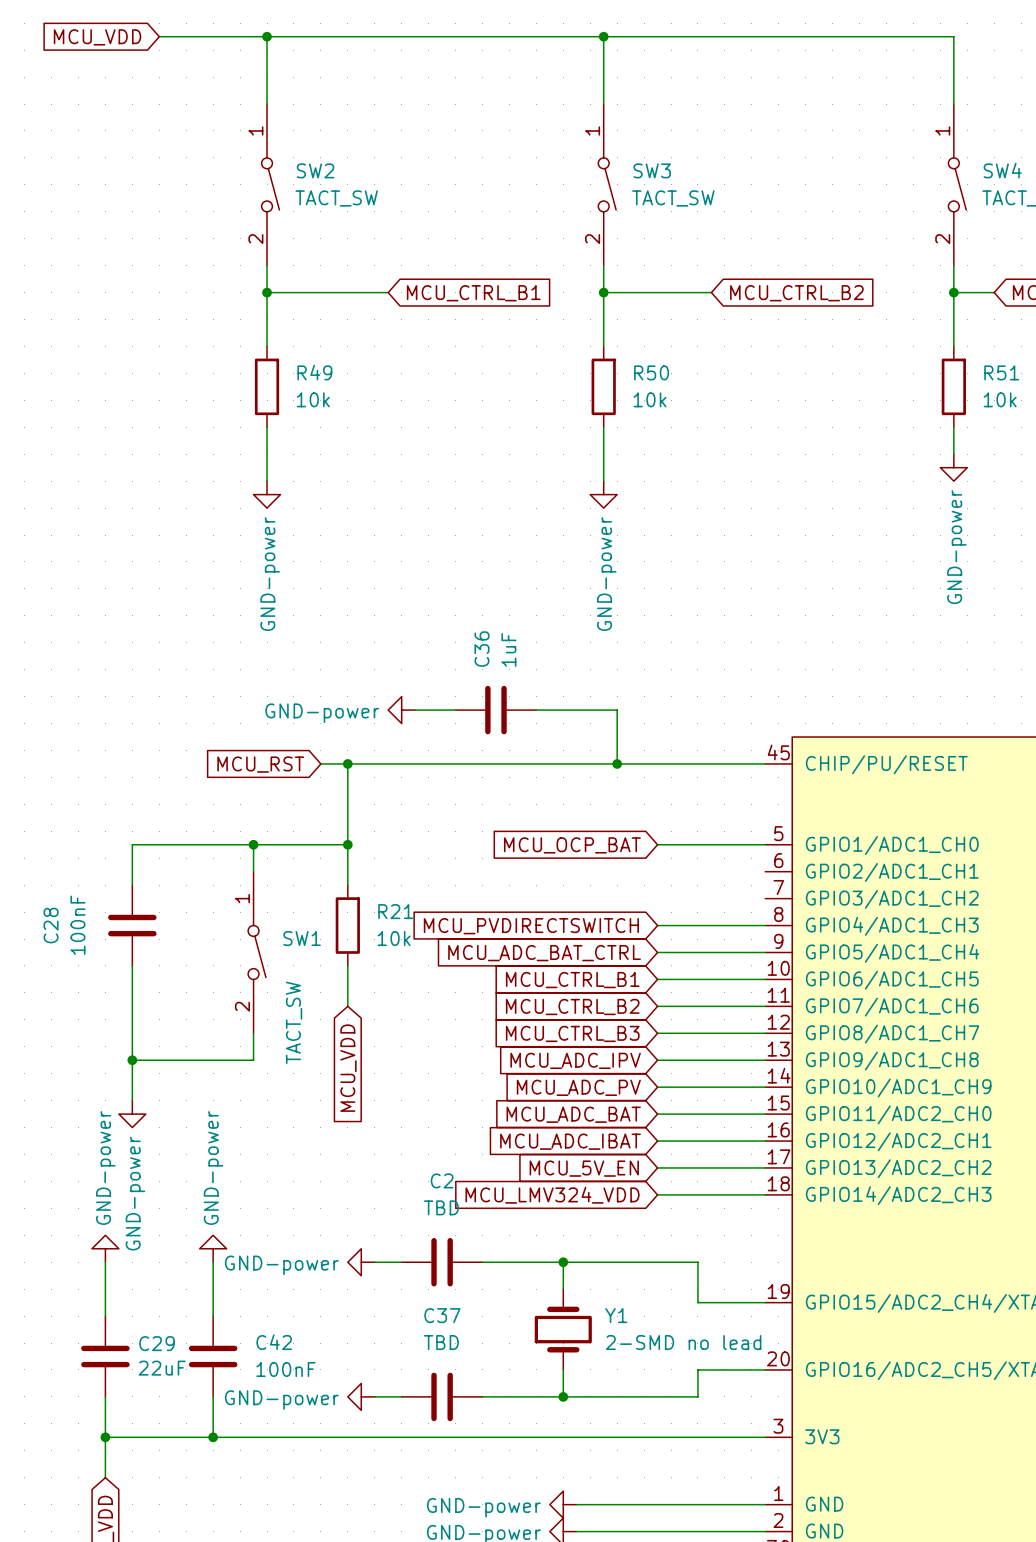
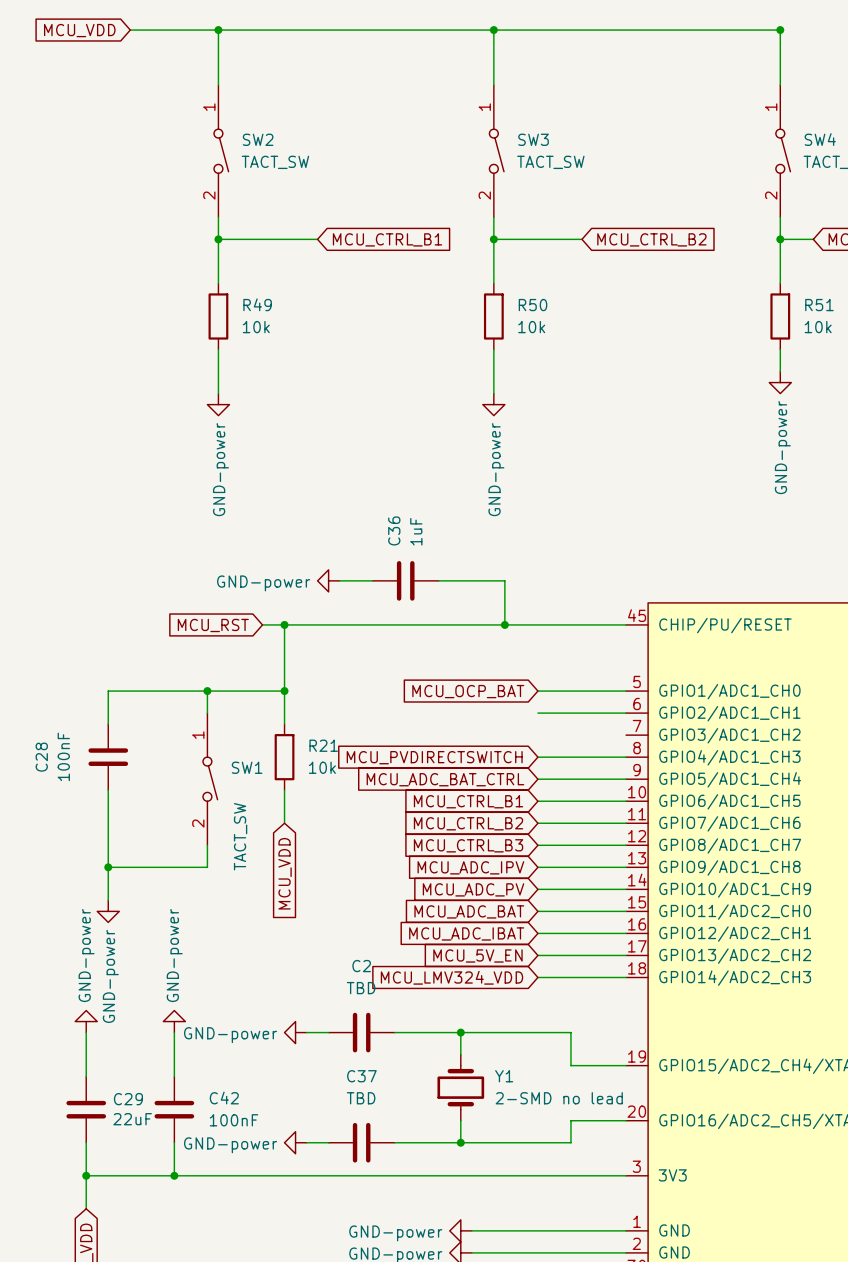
junction: none -> (780, 30)
wire: none -> (537, 713) (626, 713)

